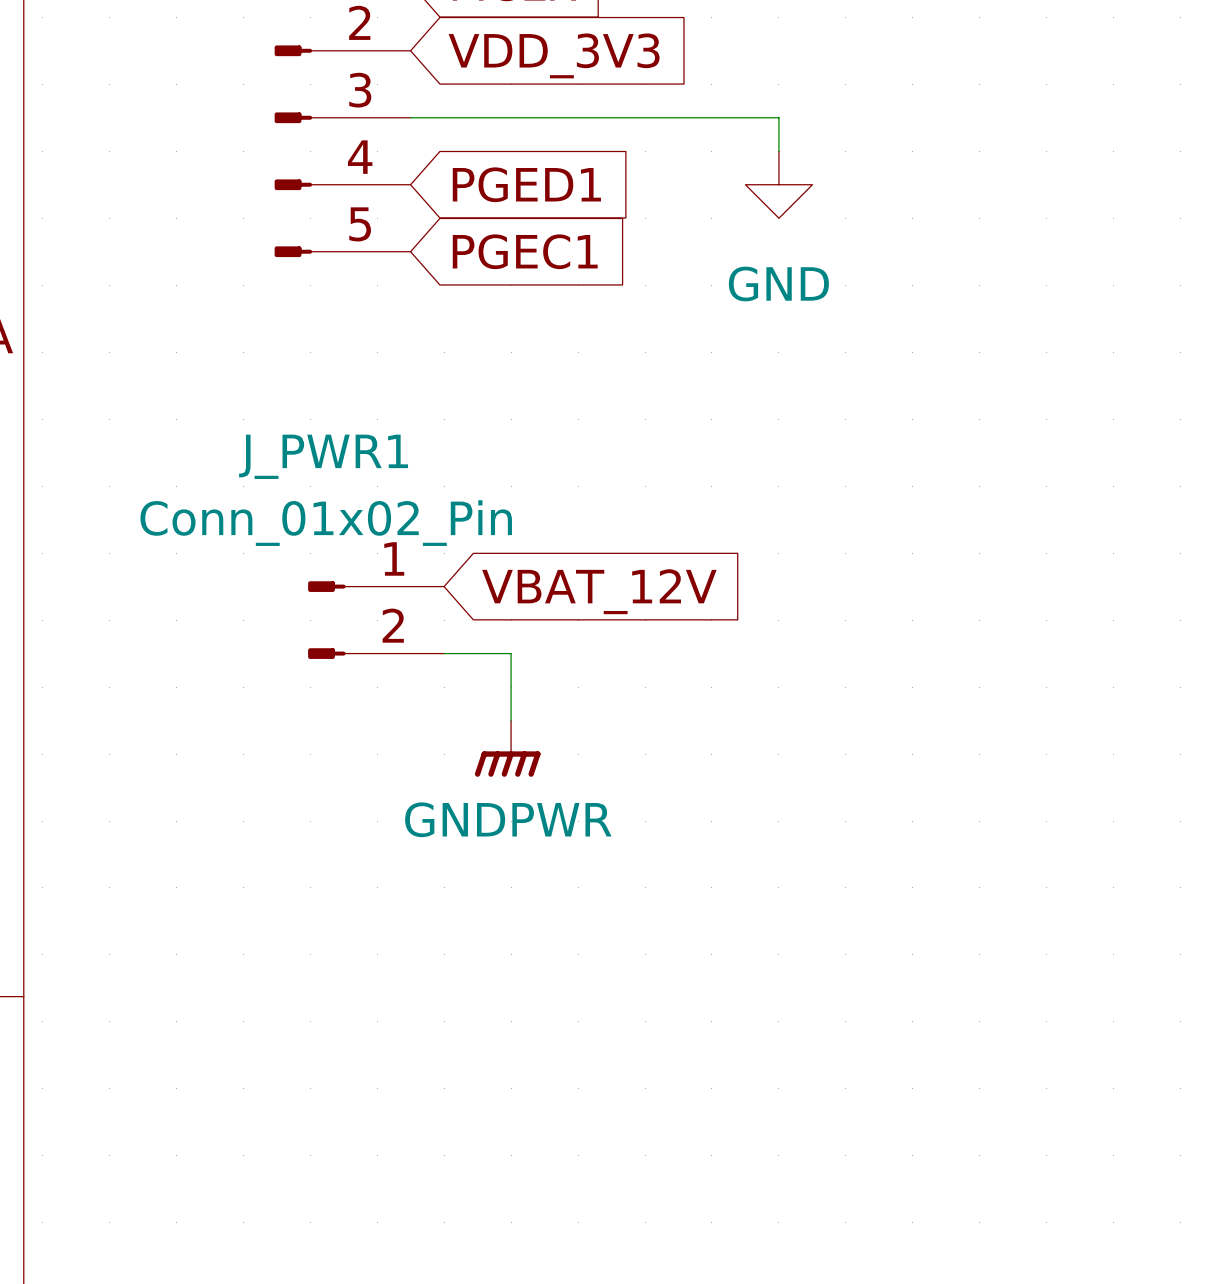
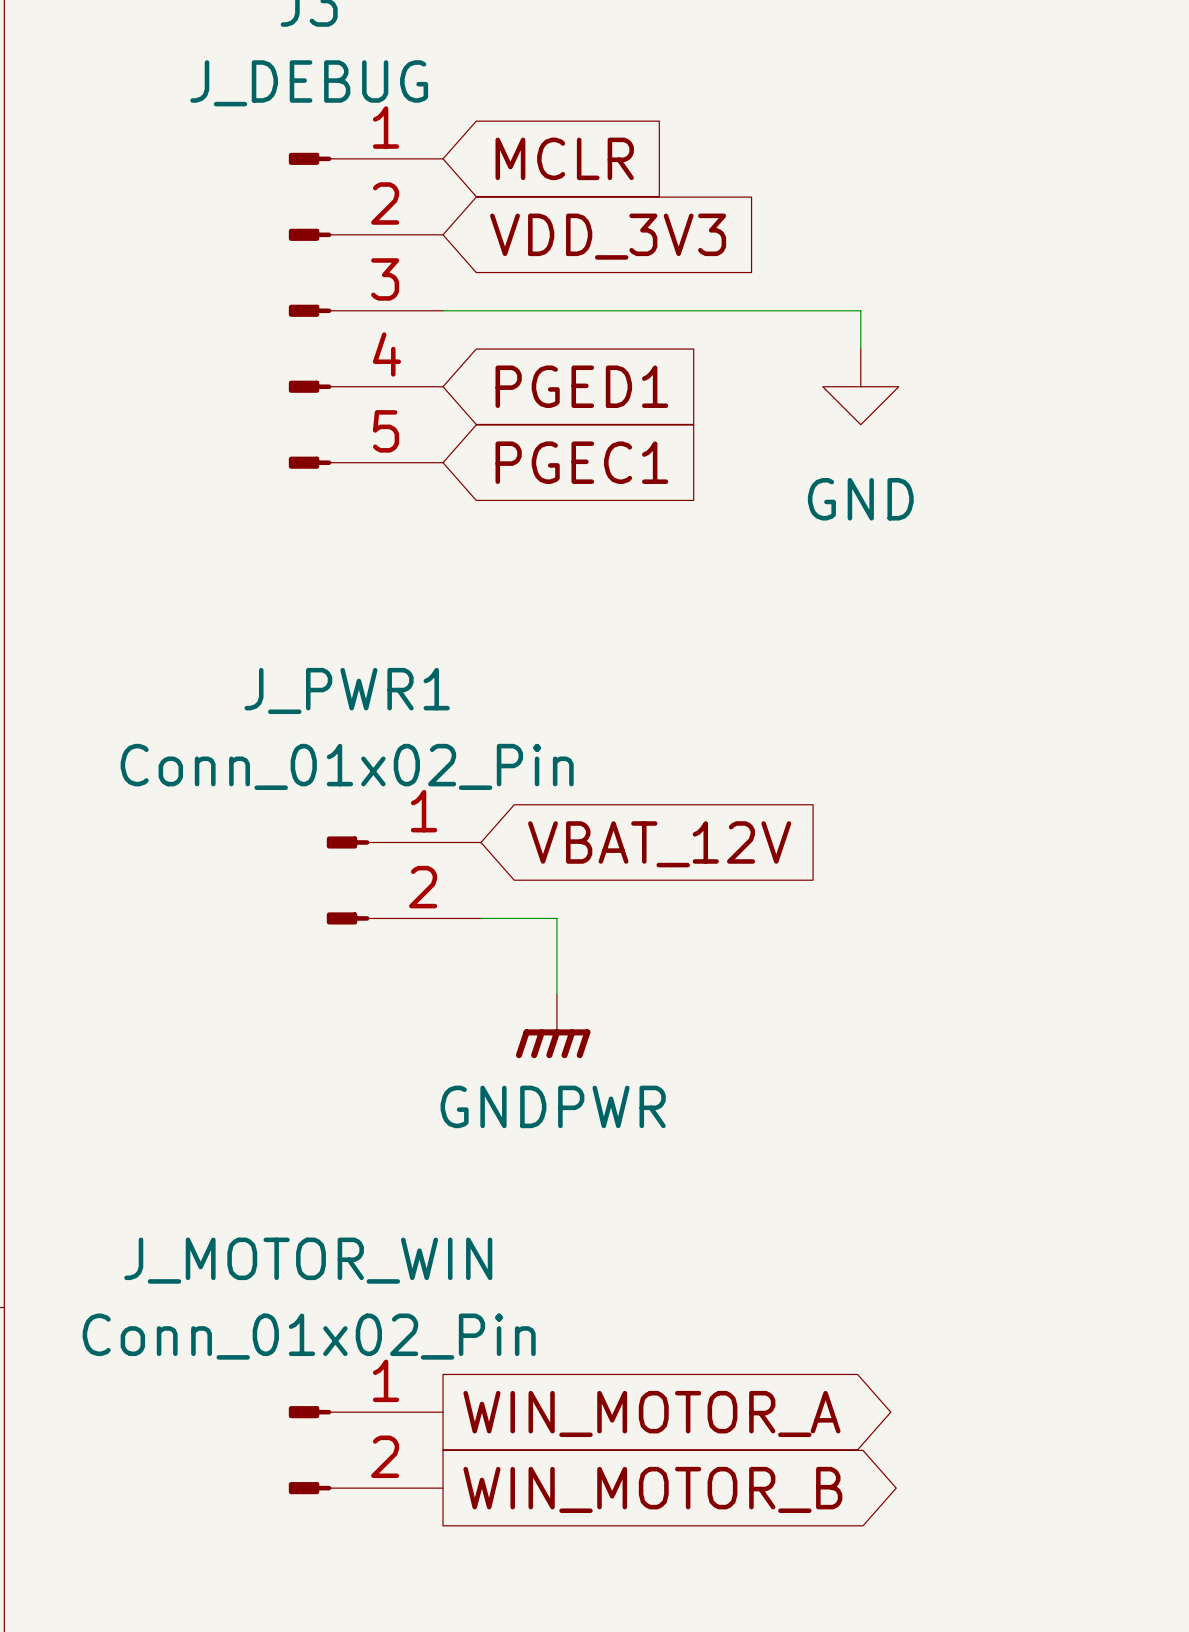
global label: none -> WIN_MOTOR_A (651, 1413)
J_MOTOR_WIN: none -> Conn_01x02_Pin (365, 1450)
global label: none -> WIN_MOTOR_B (652, 1489)

